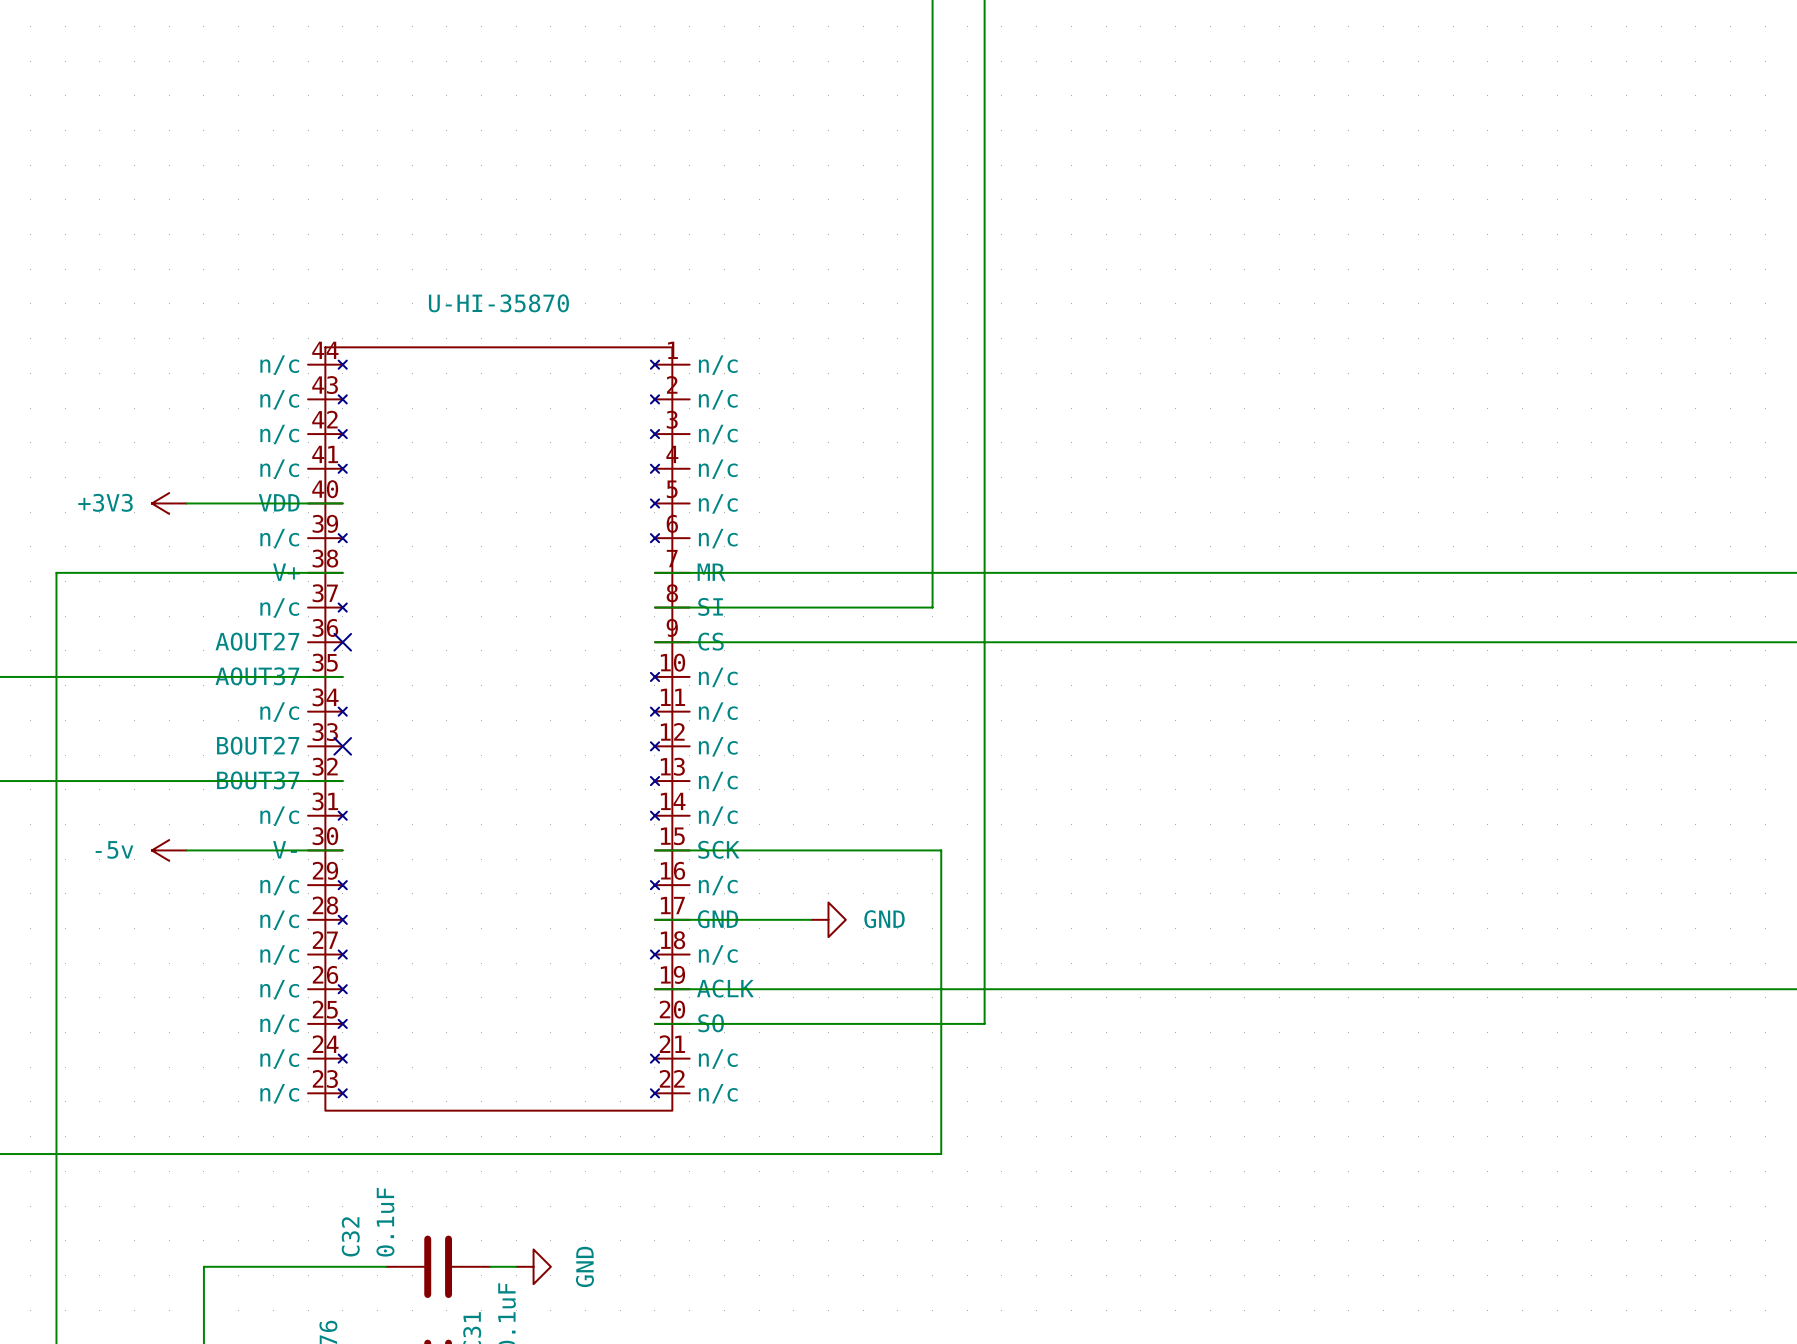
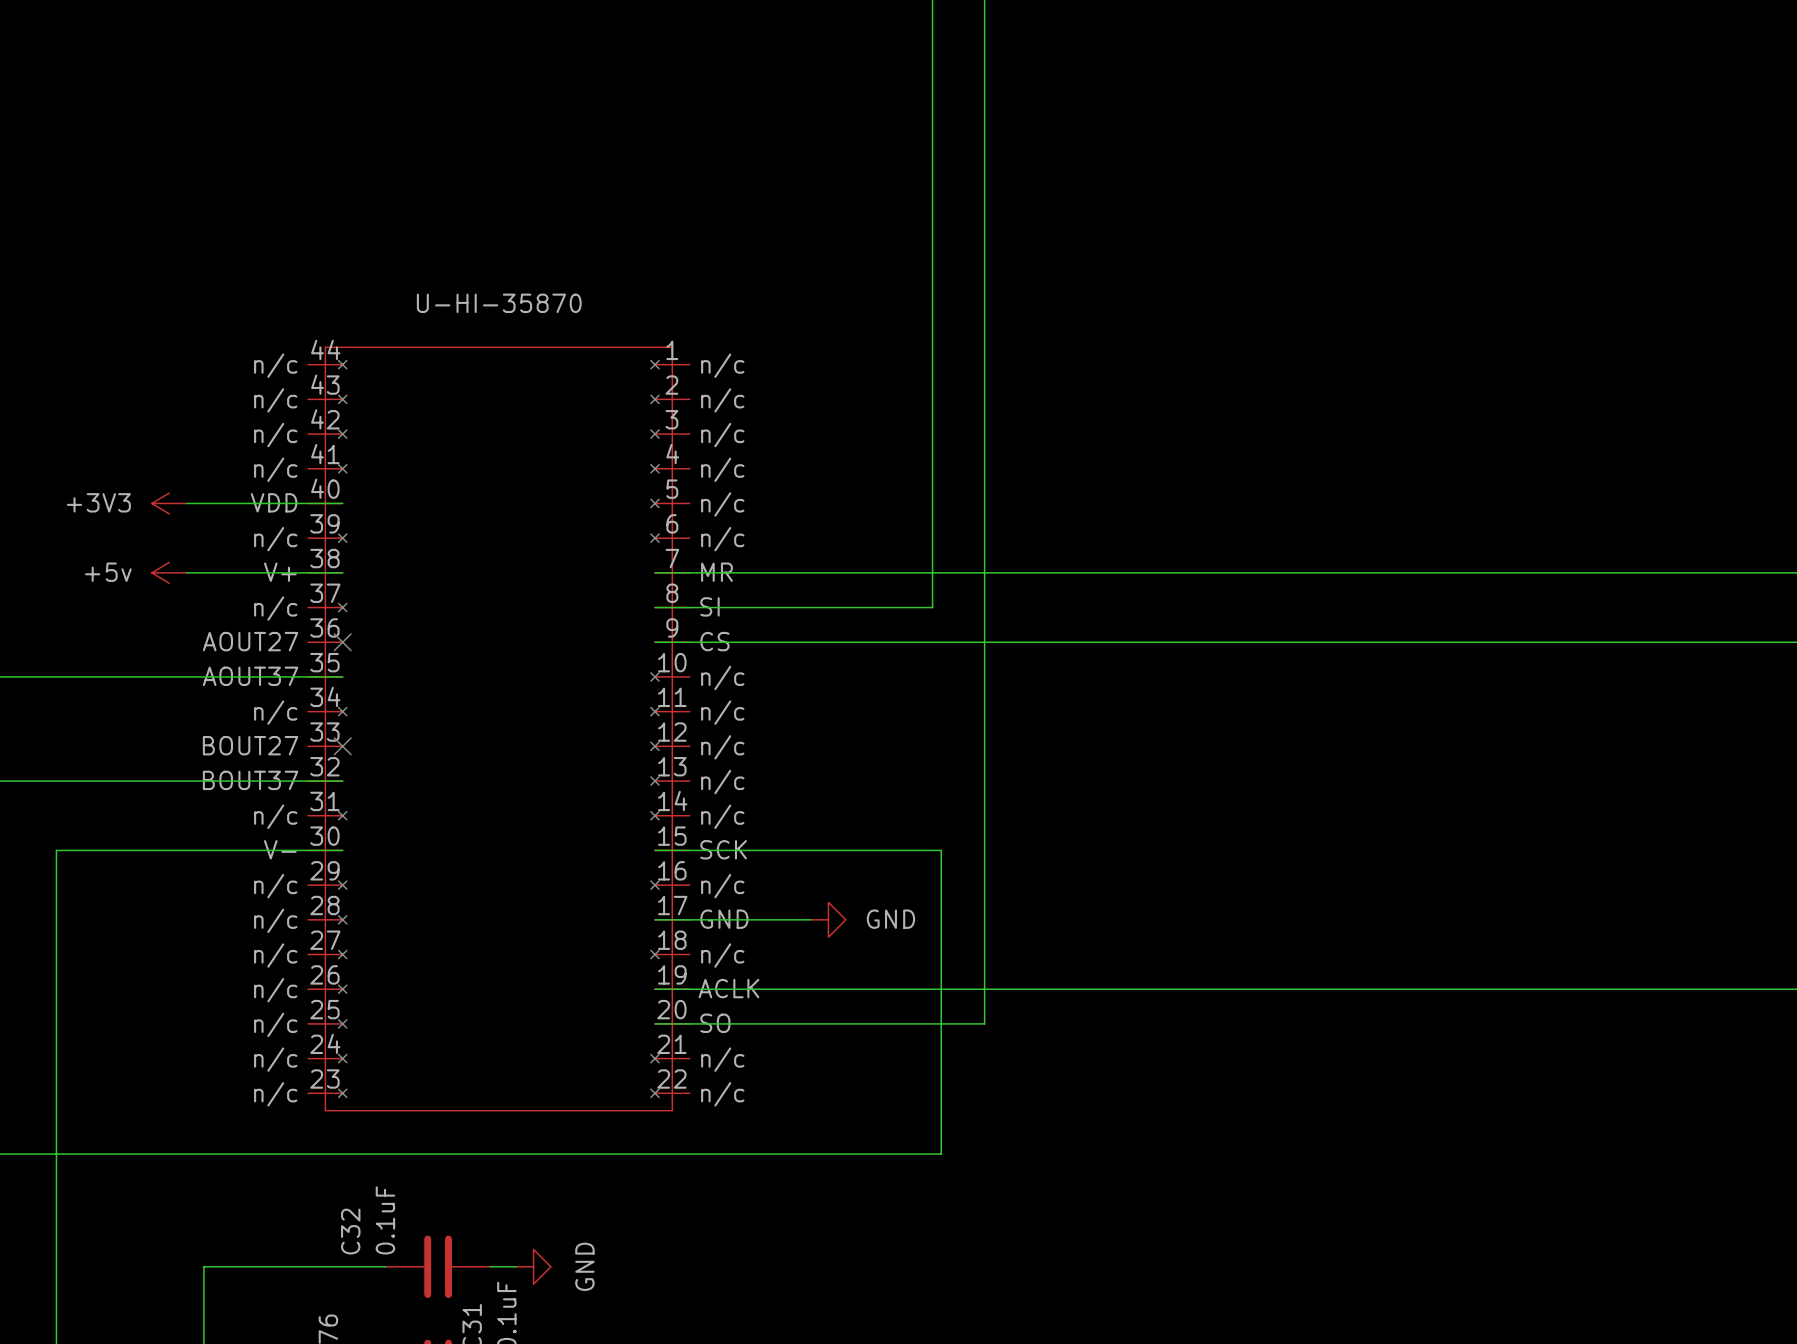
power symbol: none -> +5v (169, 572)
wire: (186, 572) (56, 572) (56, 850) -> (186, 850) (56, 850)
power symbol: -5v (169, 850) -> none

